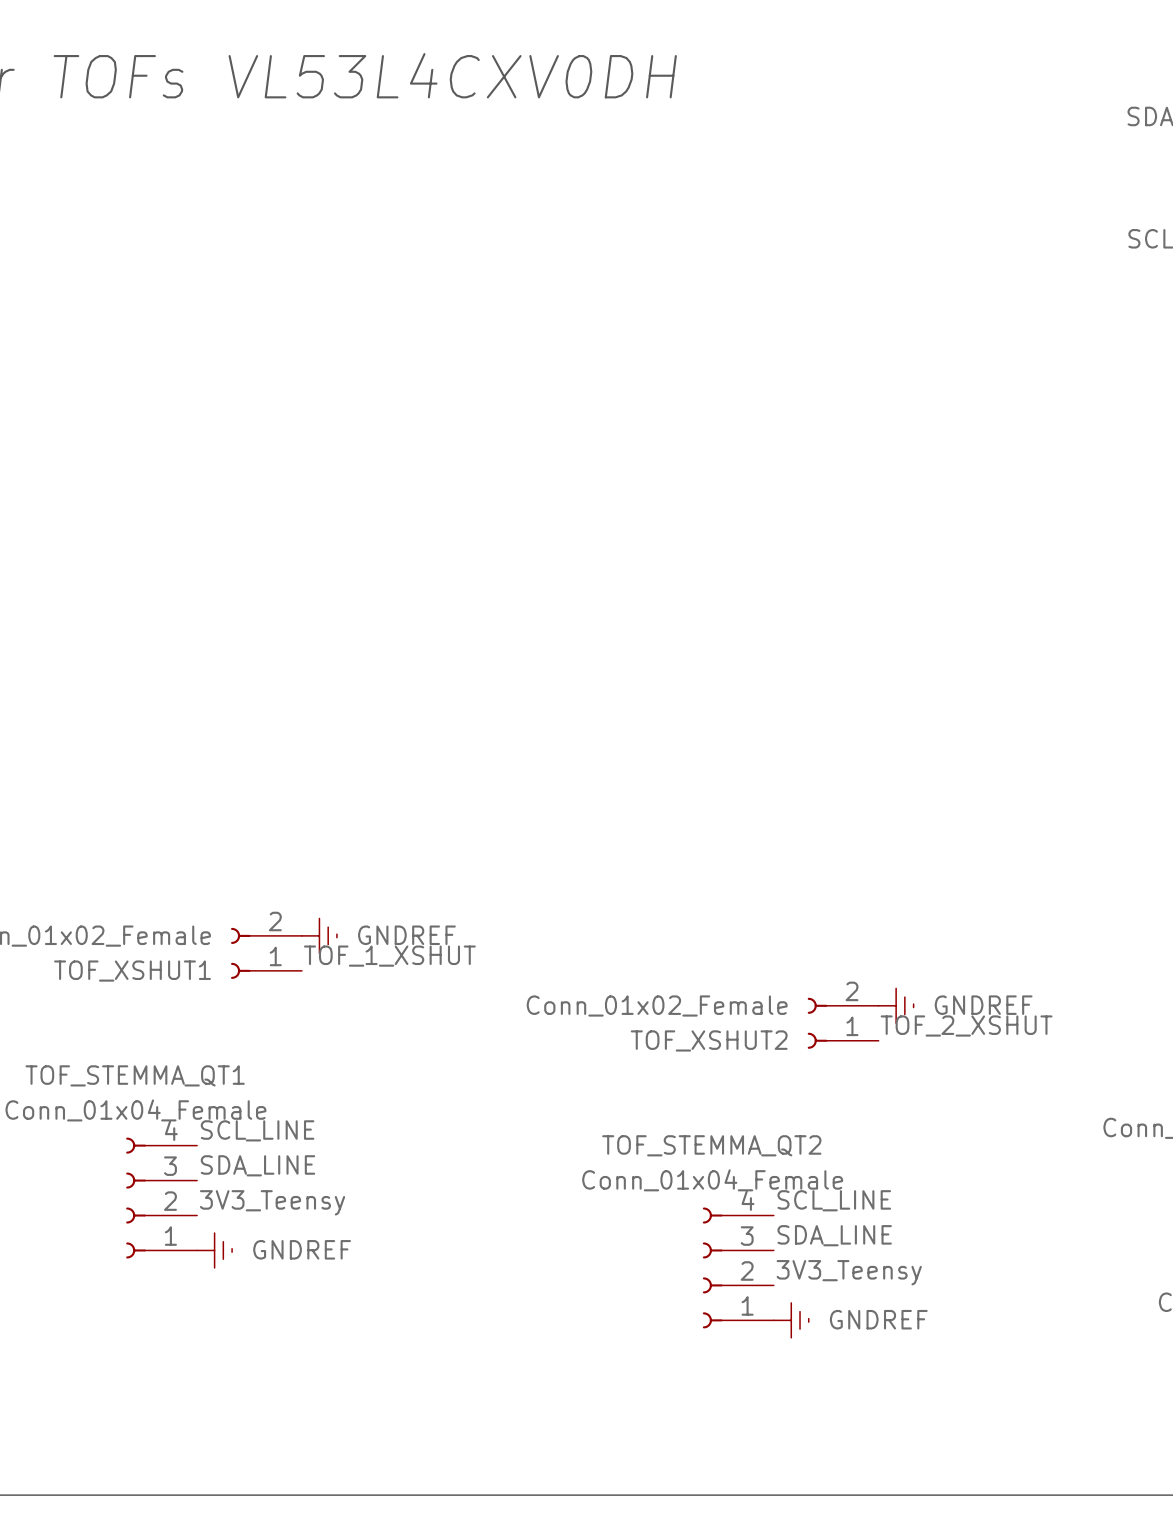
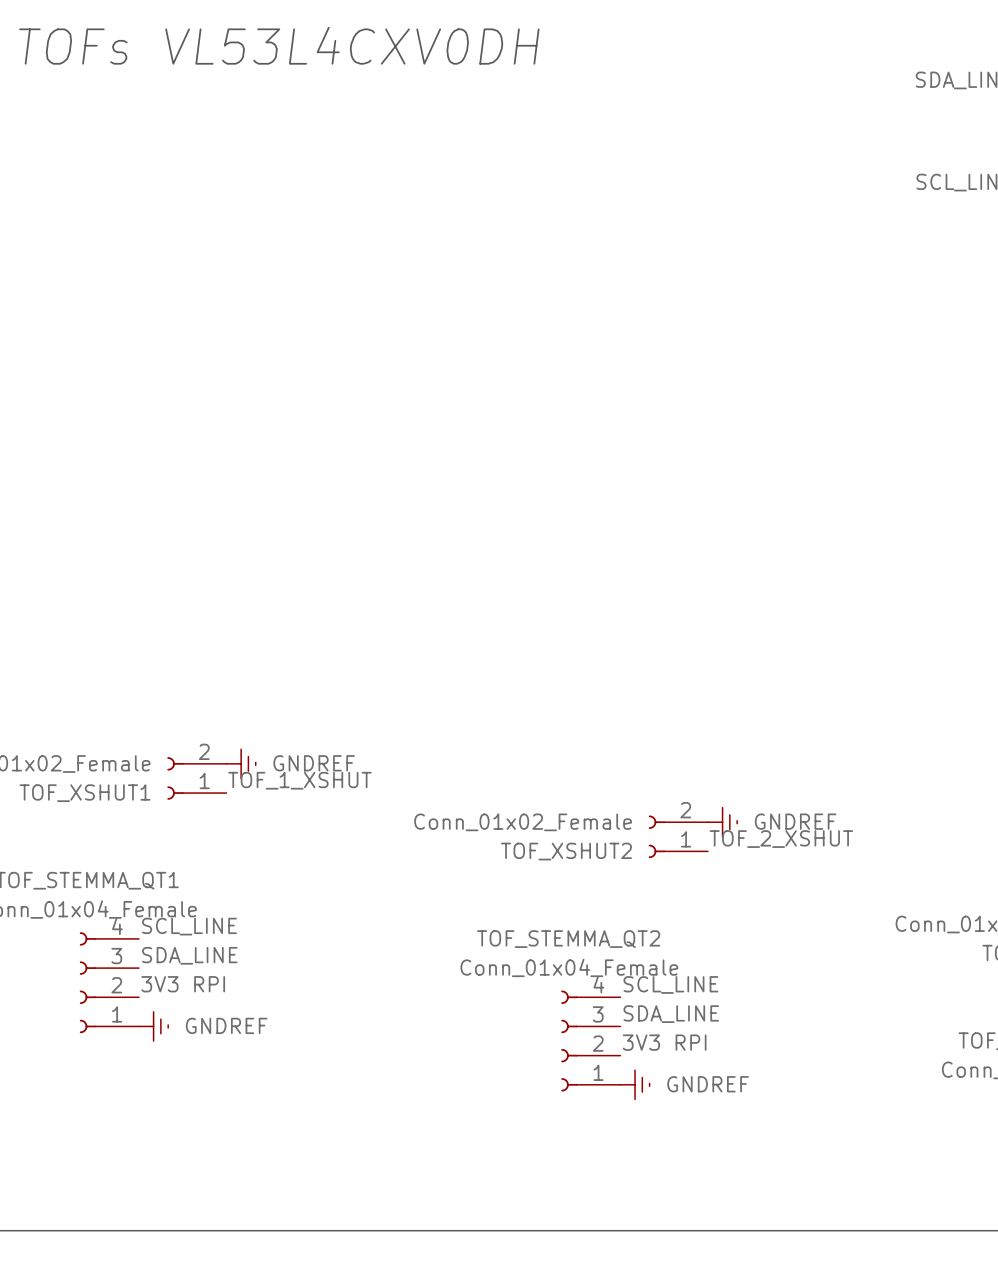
label: 3V3_Teensy (272, 1202) -> 3V3 RPI (183, 984)
label: 3V3_Teensy (849, 1272) -> 3V3 RPI (664, 1042)

